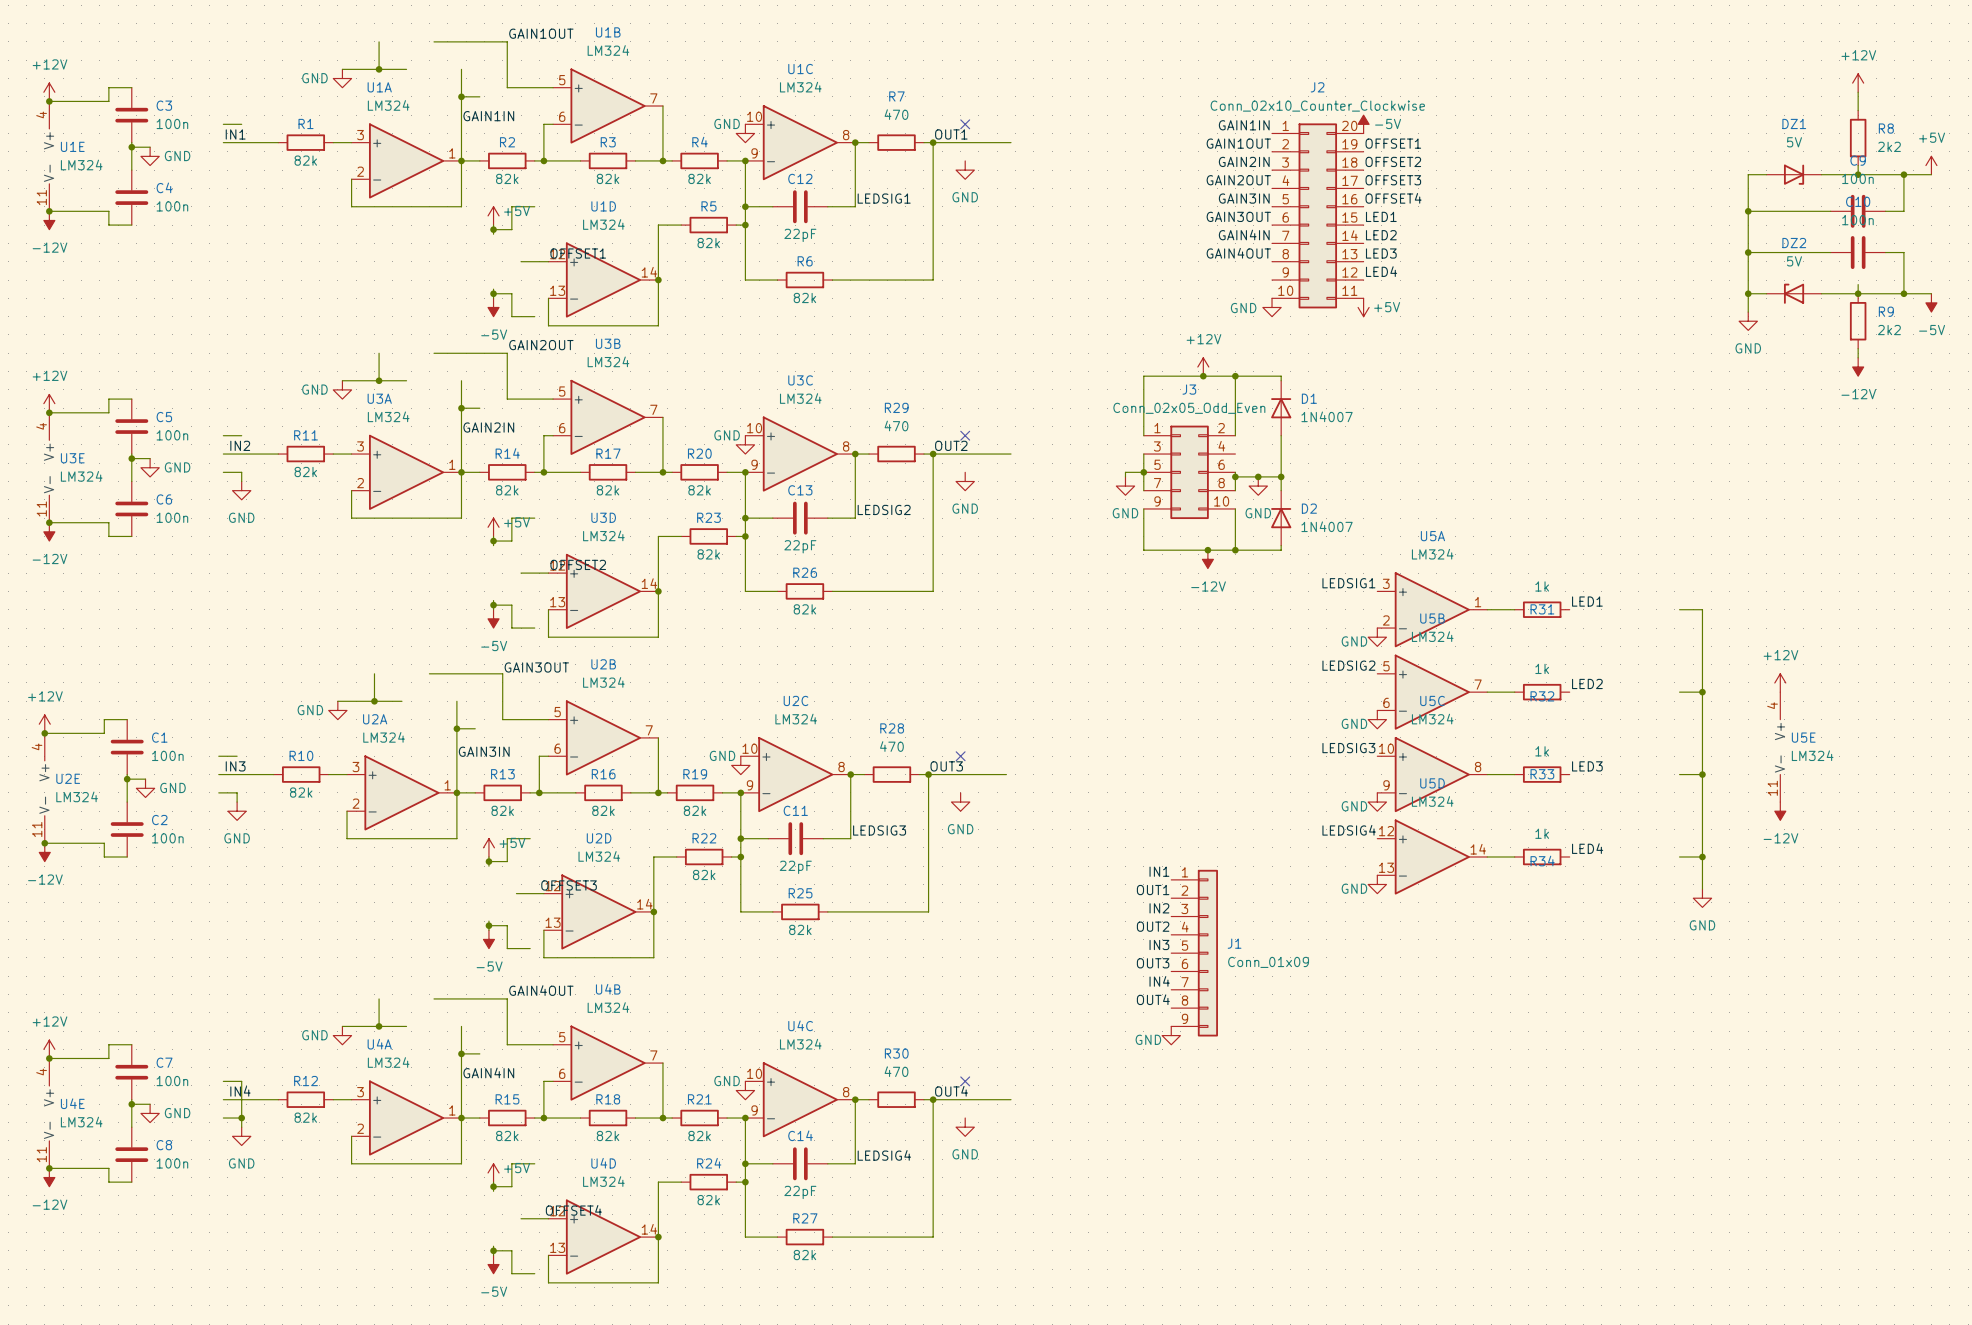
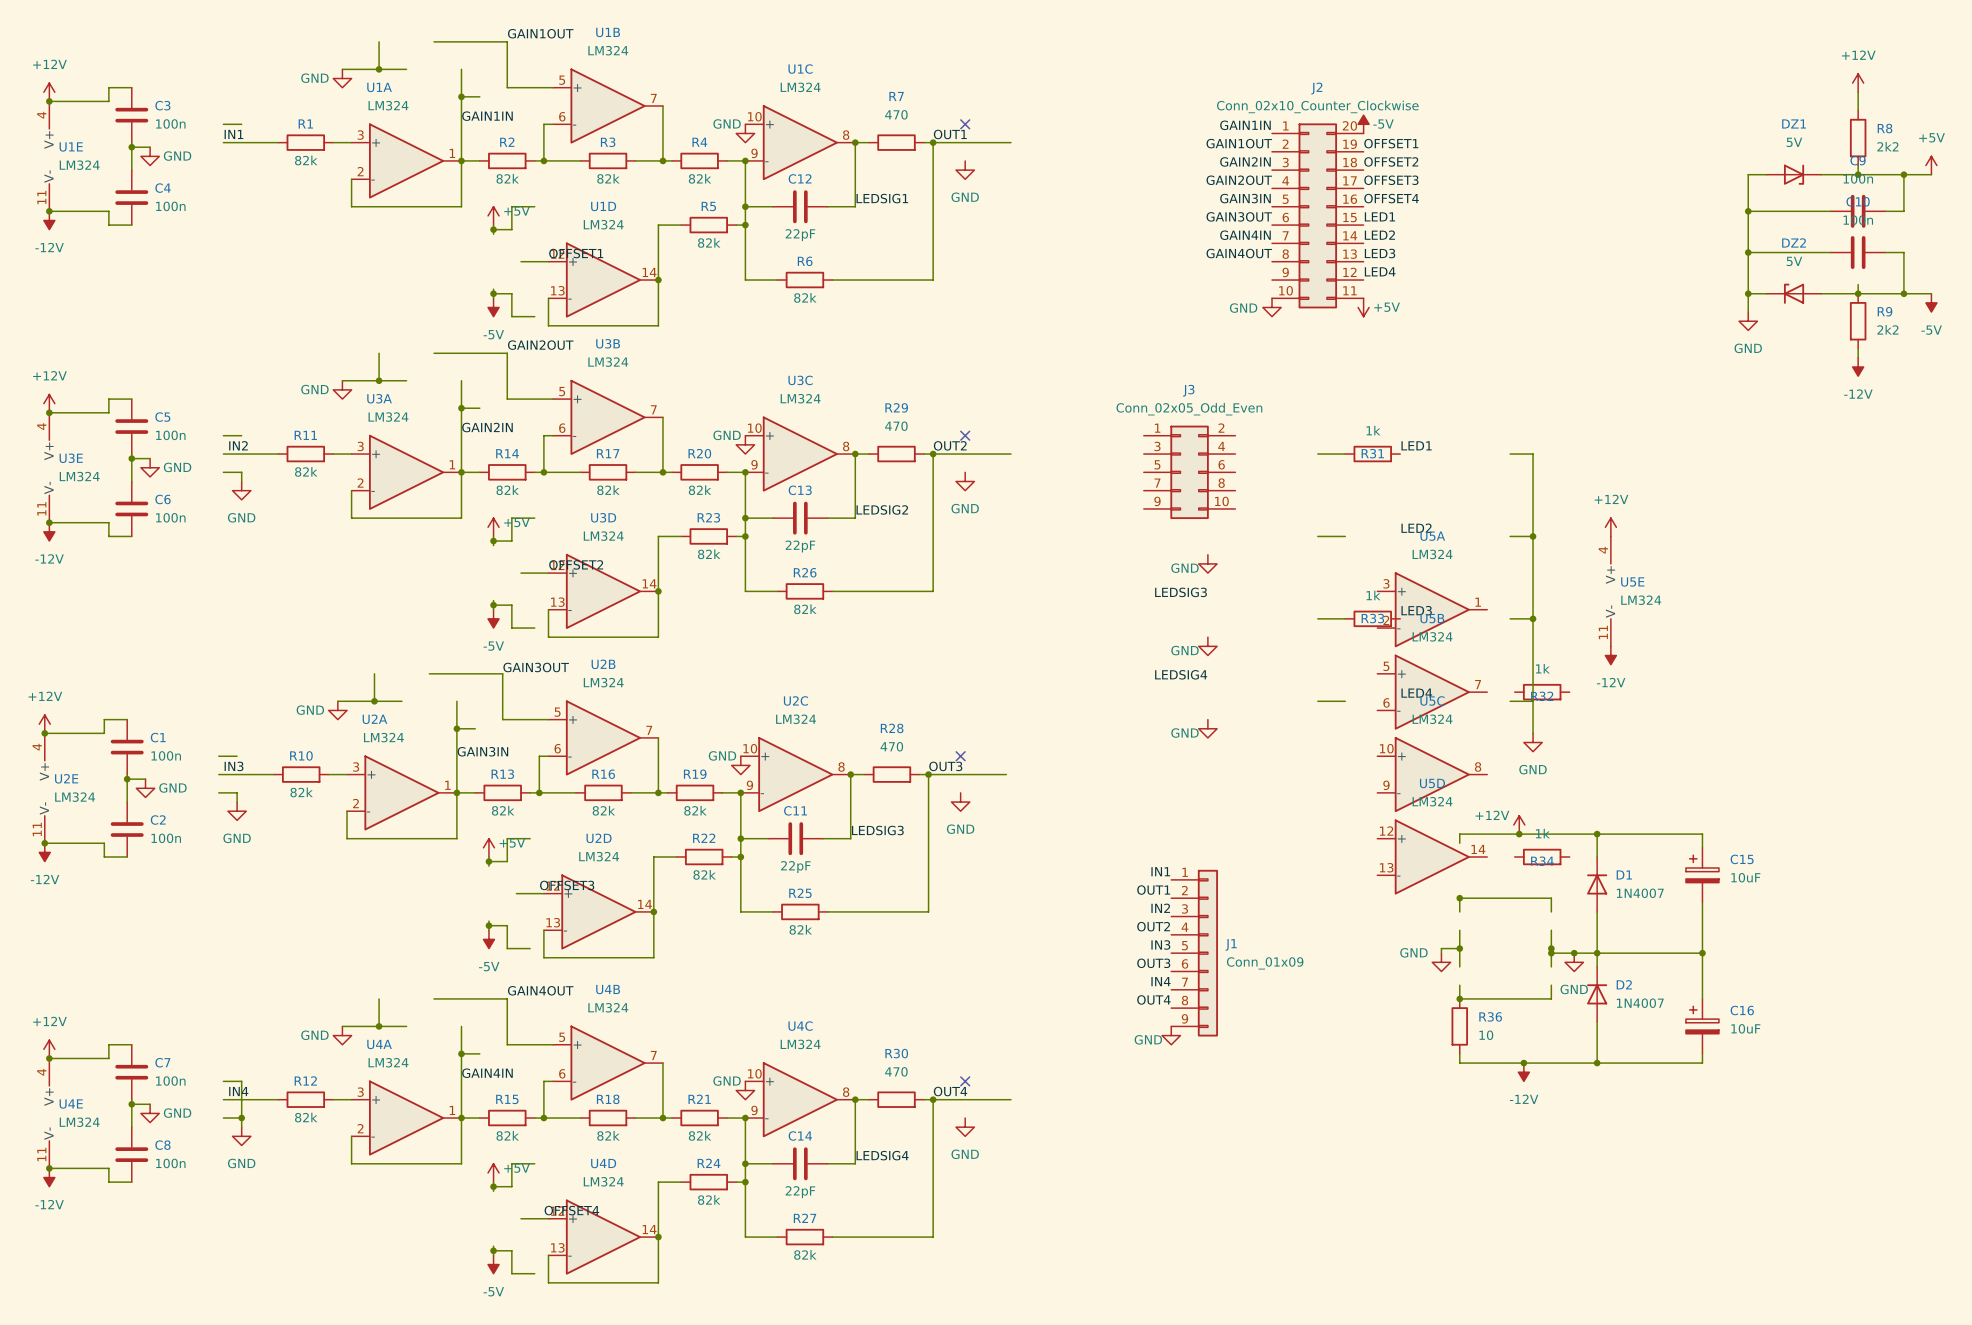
power symbol: +12V (1203, 367) -> none
junction: (1203, 376) -> none
wire: (1235, 376) (1235, 435) -> none
junction: (1235, 376) -> none
wire: (1281, 380) (1281, 376) (1143, 376) (1143, 435) -> none
D1 position: (1281, 408) -> (1597, 884)
wire: (1281, 435) (1281, 490) -> none
label: none -> LED1 (1416, 445)
wire: (1143, 454) (1143, 490) -> none
wire: none -> (1317, 454) (1345, 454)
wire: none -> (1510, 454) (1533, 454) (1533, 733)
wire: (1143, 472) (1125, 472) (1125, 476) -> none
junction: (1143, 472) -> none
wire: (1235, 472) (1235, 490) -> none
wire: (1235, 476) (1281, 476) -> none
junction: (1235, 476) -> none
junction: (1258, 476) -> none
junction: (1281, 476) -> none
power symbol: GND (1125, 486) -> none
power symbol: GND (1258, 486) -> none
wire: (1143, 508) (1143, 550) (1281, 550) (1281, 545) -> none
wire: (1235, 508) (1235, 550) -> none
D2 position: (1281, 518) -> (1597, 994)
power symbol: none -> +12V (1610, 527)
label: none -> LED2 (1416, 528)
wire: none -> (1317, 536) (1345, 536)
wire: none -> (1510, 536) (1533, 536)
junction: none -> (1533, 536)
junction: (1207, 550) -> none
junction: (1235, 550) -> none
power symbol: -12V (1207, 559) -> GND (1207, 563)
label: LEDSIG1 (1348, 583) -> none
label: none -> LEDSIG3 (1181, 592)
label: LED1 (1587, 601) -> none
wire: (1487, 609) (1514, 609) -> (1317, 618) (1345, 618)
R31 position: (1542, 609) -> (1372, 454)
wire: (1679, 609) (1702, 609) (1702, 834) -> (1459, 843) (1459, 834) (1702, 834)
label: none -> LED3 (1416, 610)
wire: none -> (1510, 618) (1533, 618)
junction: none -> (1533, 618)
power symbol: GND (1377, 637) -> none
power symbol: none -> GND (1207, 646)
power symbol: none -> -12V (1610, 655)
label: LEDSIG2 (1348, 665) -> none
label: none -> LEDSIG4 (1181, 674)
power symbol: +12V (1780, 682) -> none
label: LED2 (1587, 683) -> none
label: none -> LED4 (1416, 693)
wire: (1487, 692) (1514, 692) -> (1317, 701) (1345, 701)
wire: (1679, 692) (1702, 692) -> (1510, 701) (1533, 701)
junction: (1702, 692) -> none
power symbol: GND (1377, 719) -> none
power symbol: none -> GND (1207, 728)
power symbol: none -> GND (1533, 742)
U5E position: (1780, 747) -> (1610, 591)
label: LEDSIG3 (1348, 748) -> none
label: LED3 (1587, 766) -> none
wire: (1487, 774) (1514, 774) -> none
R33 position: (1542, 774) -> (1372, 618)
wire: (1679, 774) (1702, 774) -> none
junction: (1702, 774) -> none
power symbol: GND (1377, 802) -> none
power symbol: -12V (1780, 811) -> none
power symbol: none -> +12V (1519, 824)
label: LEDSIG4 (1349, 830) -> none
junction: none -> (1519, 834)
wire: none -> (1597, 834) (1597, 856)
junction: none -> (1597, 834)
label: LED4 (1587, 848) -> none
wire: (1487, 856) (1514, 856) -> none
wire: (1679, 856) (1702, 856) -> none
junction: (1702, 856) -> none
C15: none -> 10uF (1702, 875)
power symbol: GND (1377, 884) -> none
junction: none -> (1459, 898)
power symbol: GND (1702, 898) -> none
wire: none -> (1702, 902) (1702, 998)
wire: none -> (1459, 911) (1459, 898) (1551, 898) (1551, 911)
wire: none -> (1597, 911) (1597, 966)
wire: none -> (1459, 930) (1459, 966)
wire: none -> (1551, 930) (1551, 966)
wire: none -> (1459, 948) (1441, 948) (1441, 953)
junction: none -> (1459, 948)
junction: none -> (1551, 948)
wire: none -> (1551, 953) (1702, 953)
junction: none -> (1551, 953)
junction: none -> (1574, 953)
junction: none -> (1597, 953)
junction: none -> (1702, 953)
power symbol: none -> GND (1441, 962)
power symbol: none -> GND (1574, 962)
wire: none -> (1459, 985) (1459, 998) (1551, 998) (1551, 985)
junction: none -> (1459, 998)
wire: none -> (1597, 1021) (1597, 1063)
R36: none -> 10 (1459, 1026)
C16: none -> 10uF (1702, 1026)
wire: none -> (1459, 1053) (1459, 1063) (1702, 1063) (1702, 1053)
junction: none -> (1523, 1063)
junction: none -> (1597, 1063)
power symbol: none -> -12V (1523, 1072)

